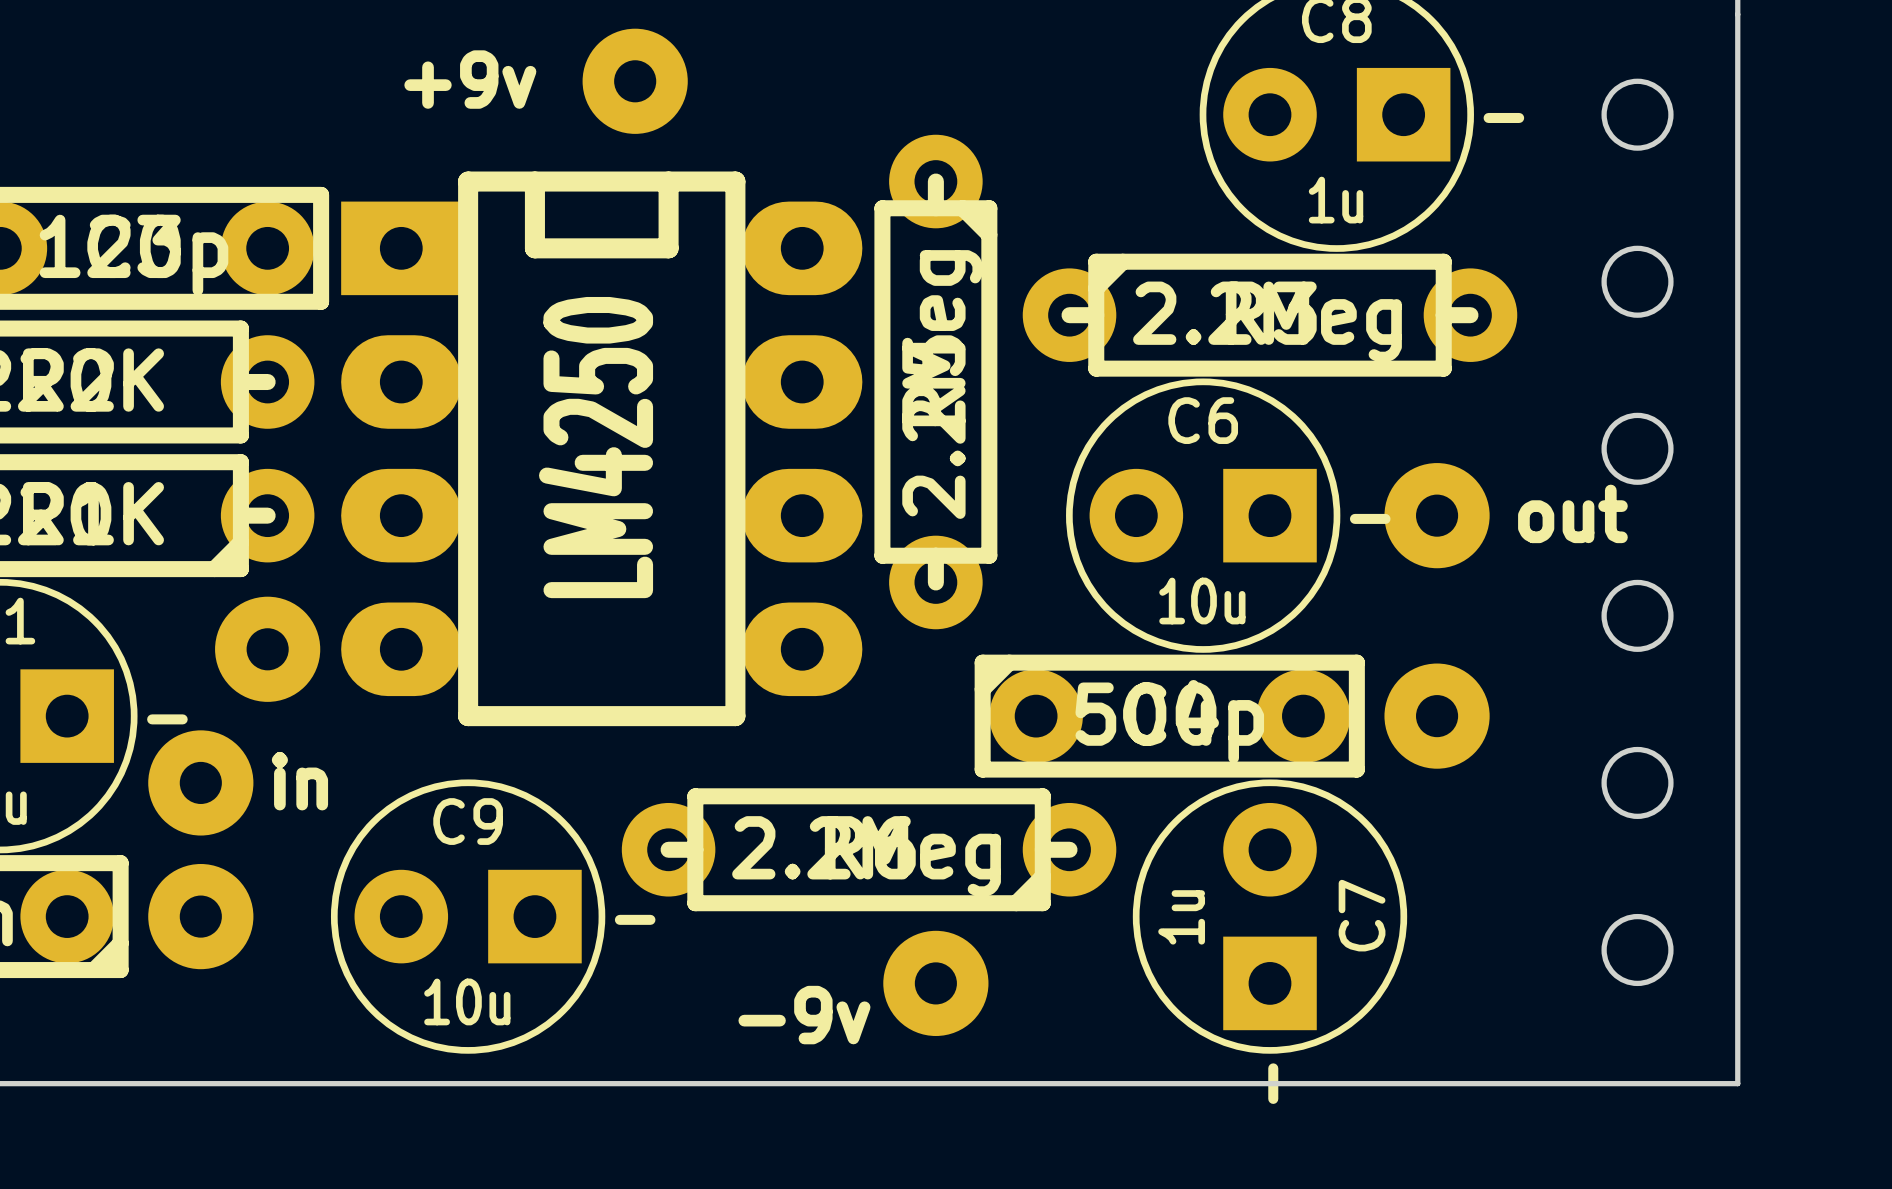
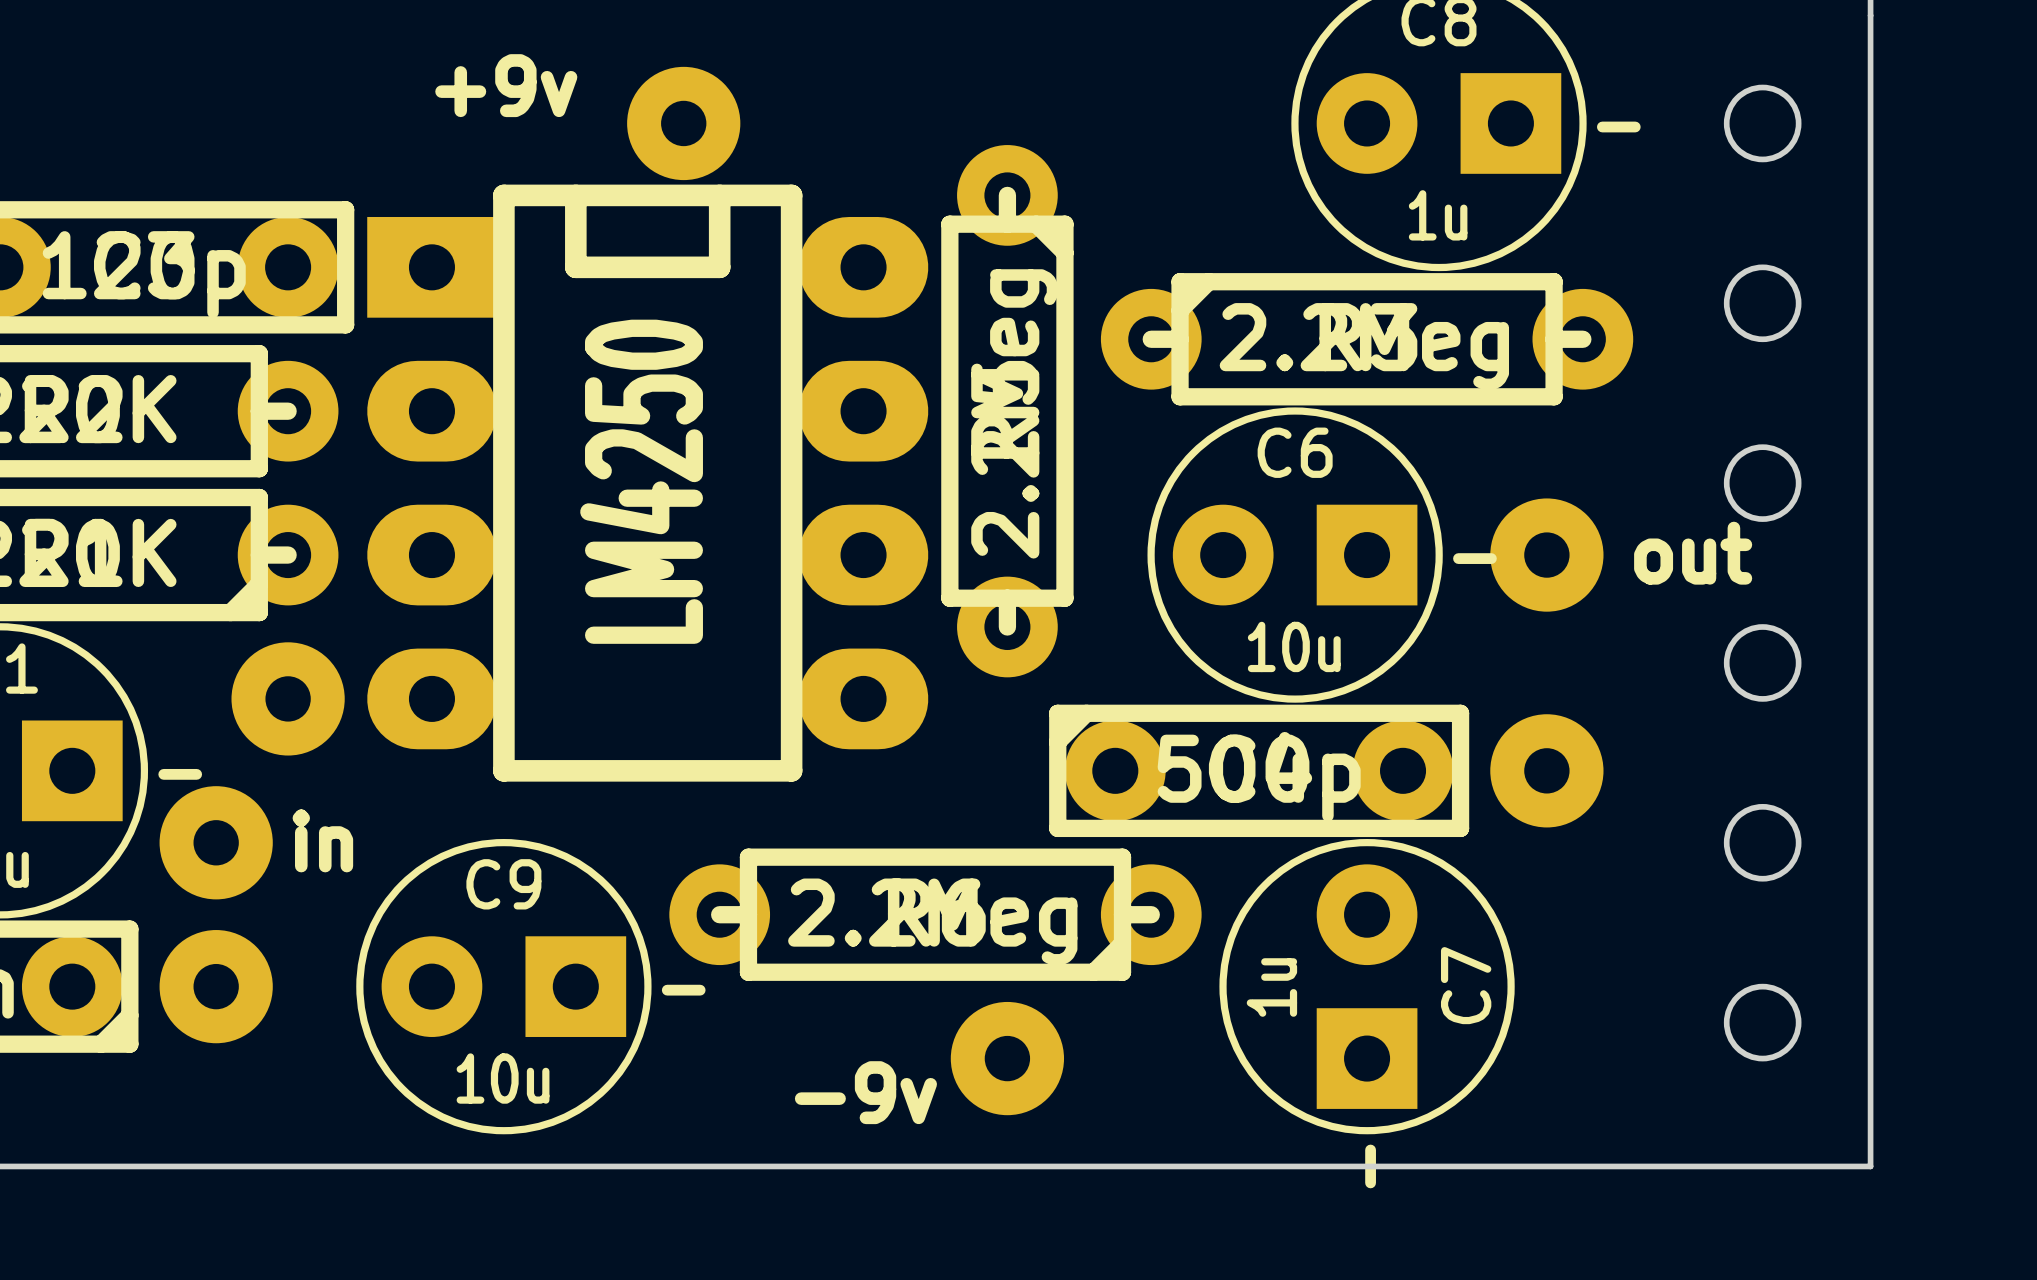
part position: (635, 81) -> (683, 123)

